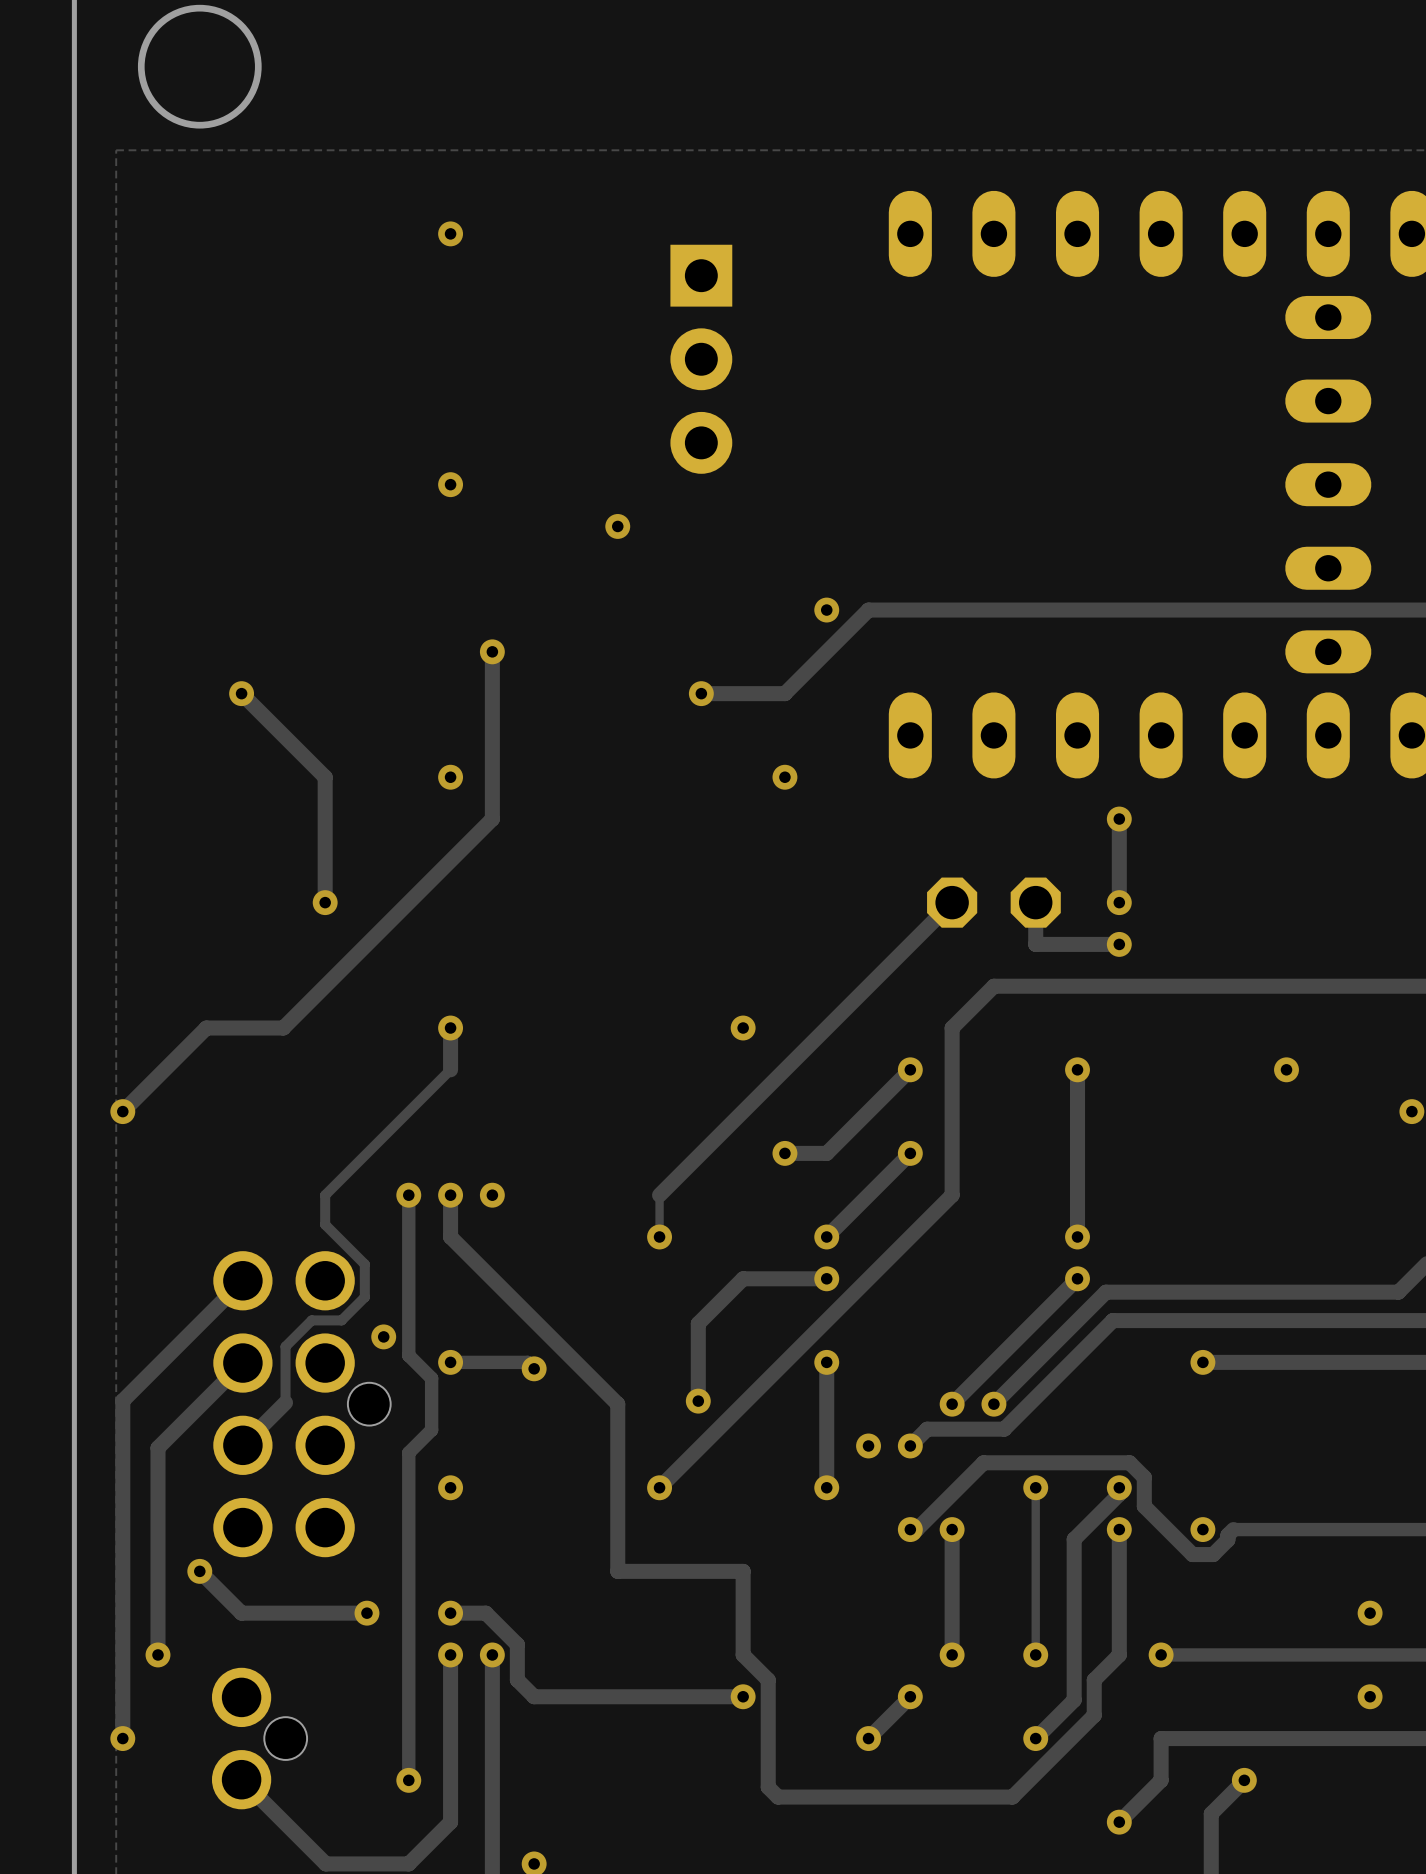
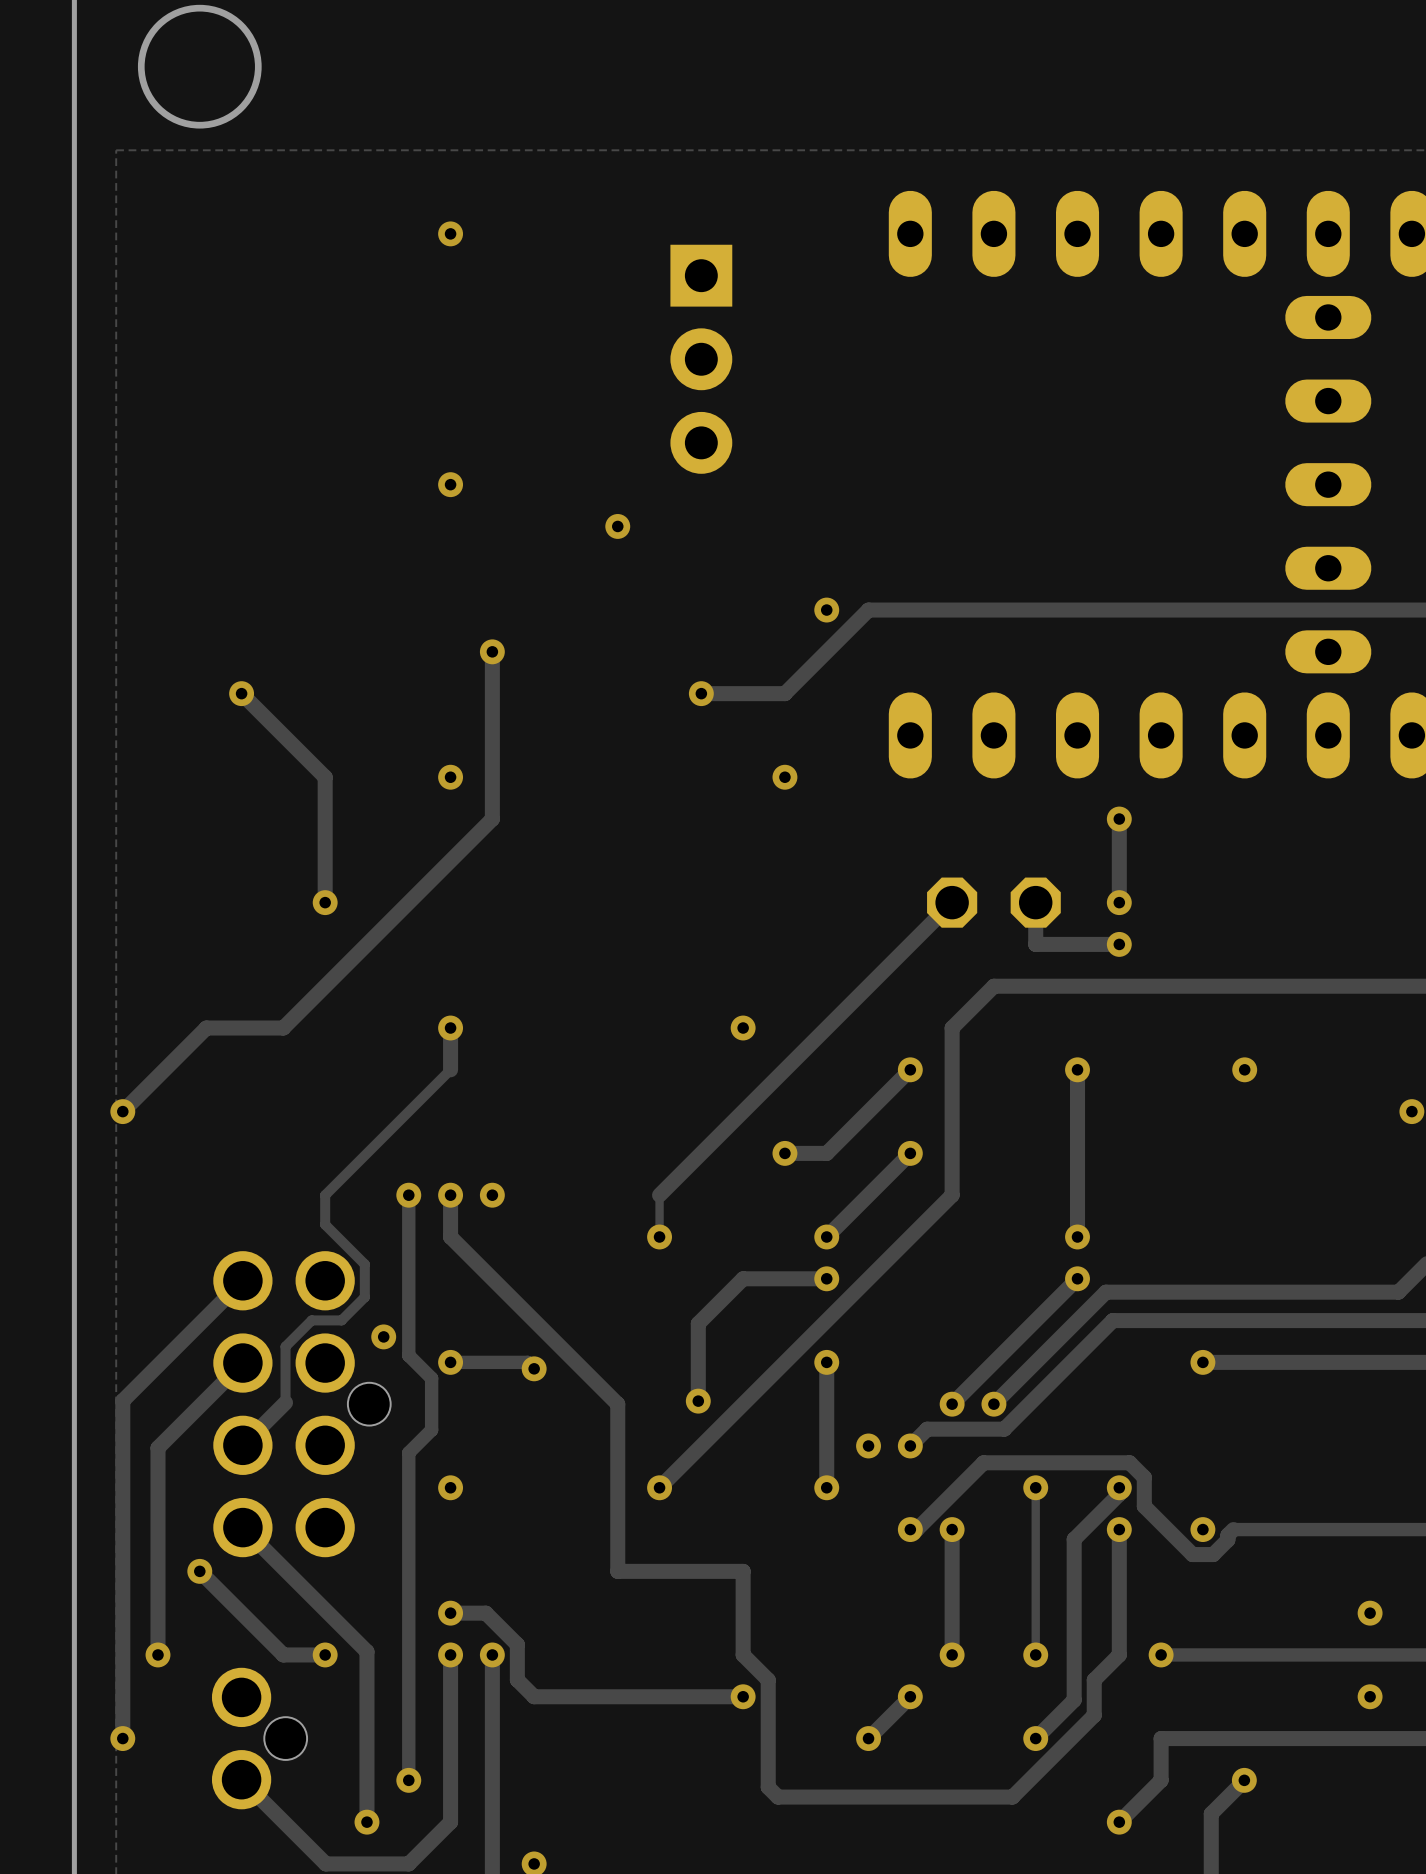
via position: (1286, 1069) -> (1244, 1069)
track: none -> (242, 1527) (366, 1651) (366, 1822)
track: (366, 1613) (241, 1613) -> (325, 1654) (283, 1654) (241, 1613)
via position: (366, 1613) -> (325, 1654)
via: none -> (366, 1822)

